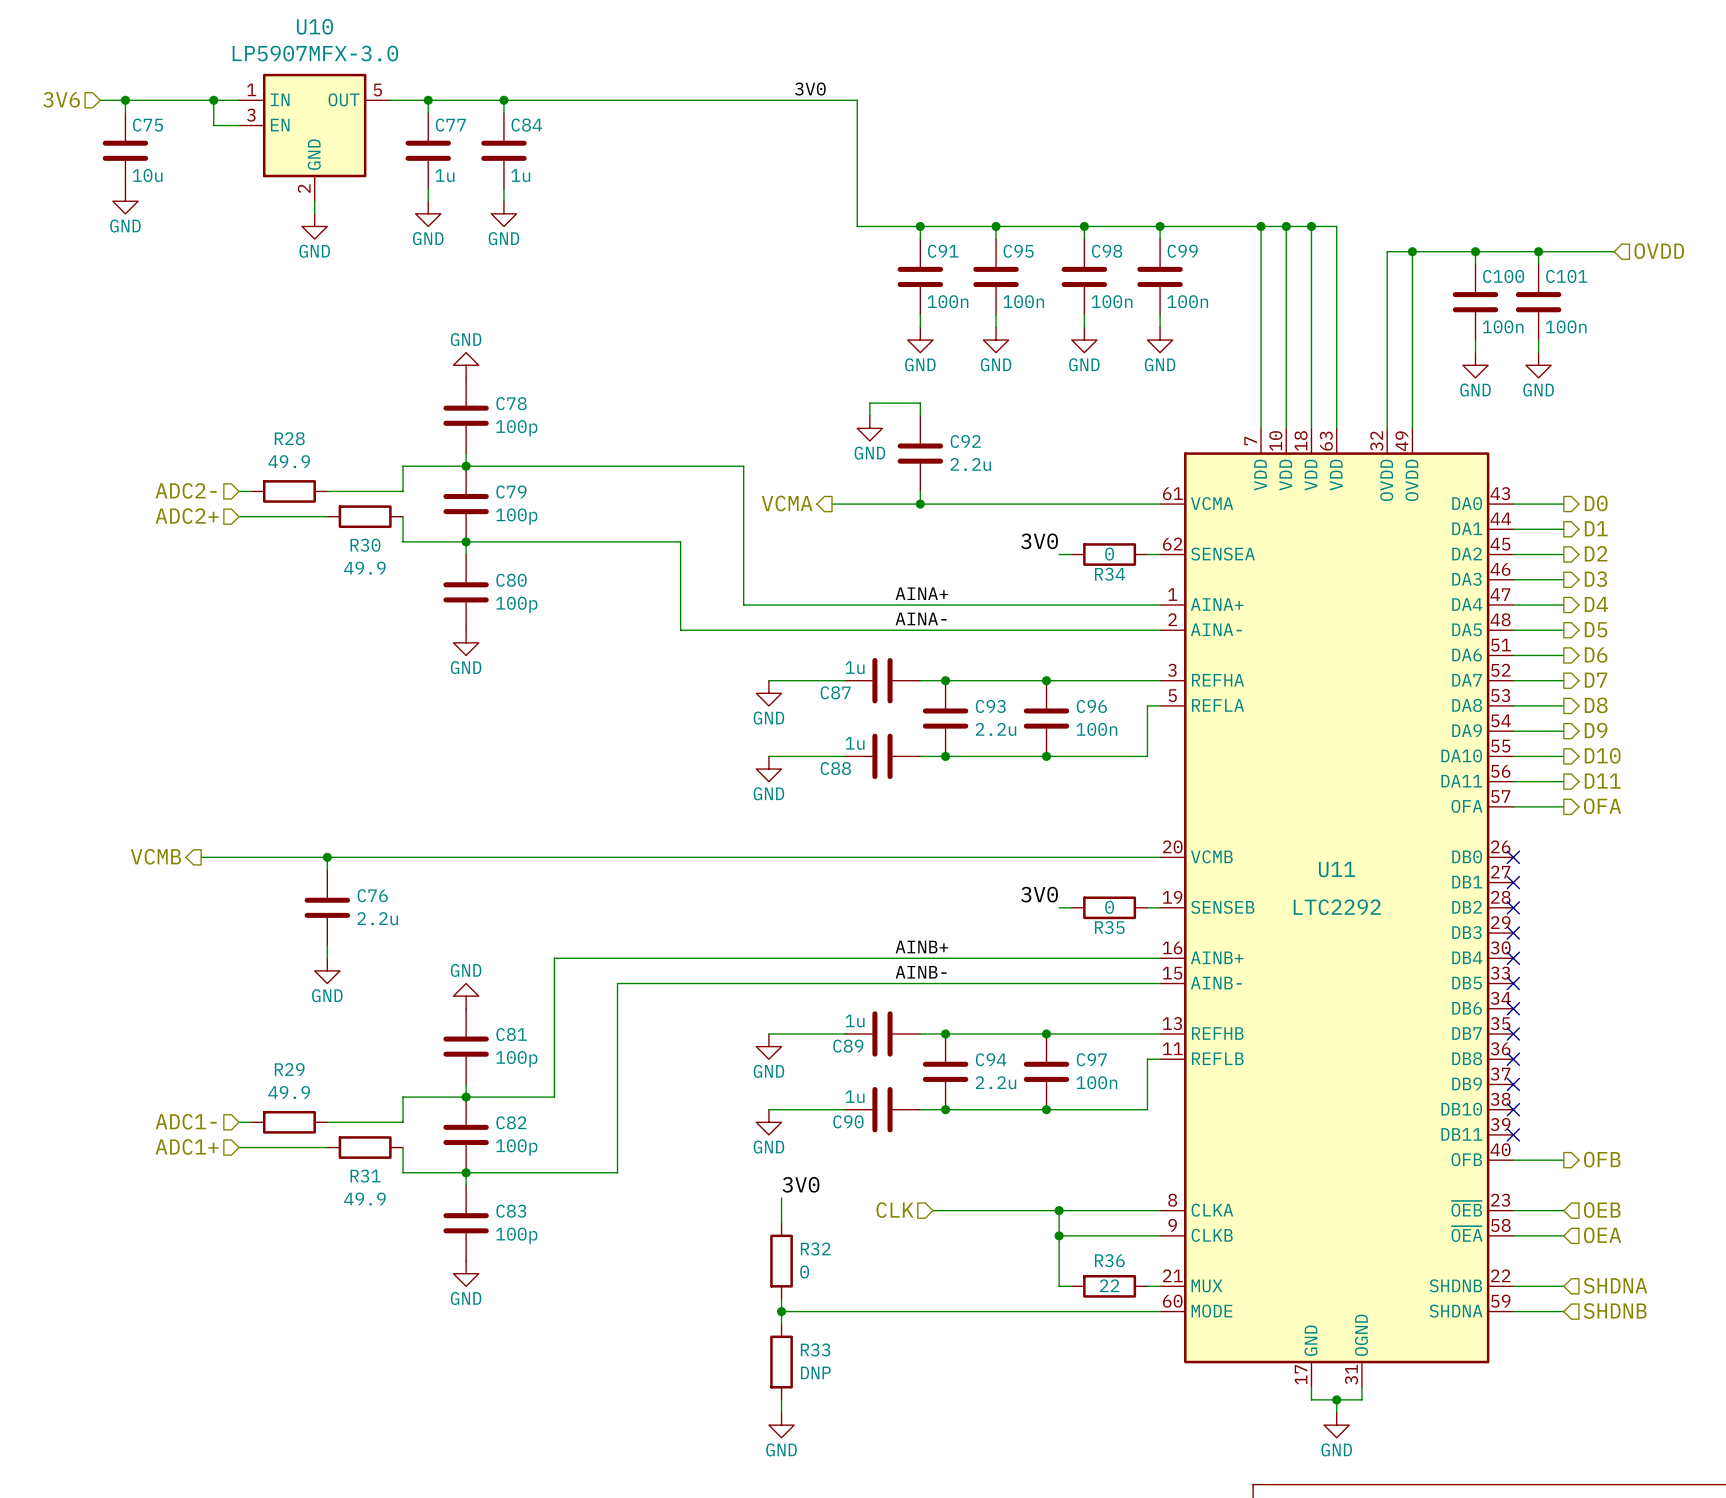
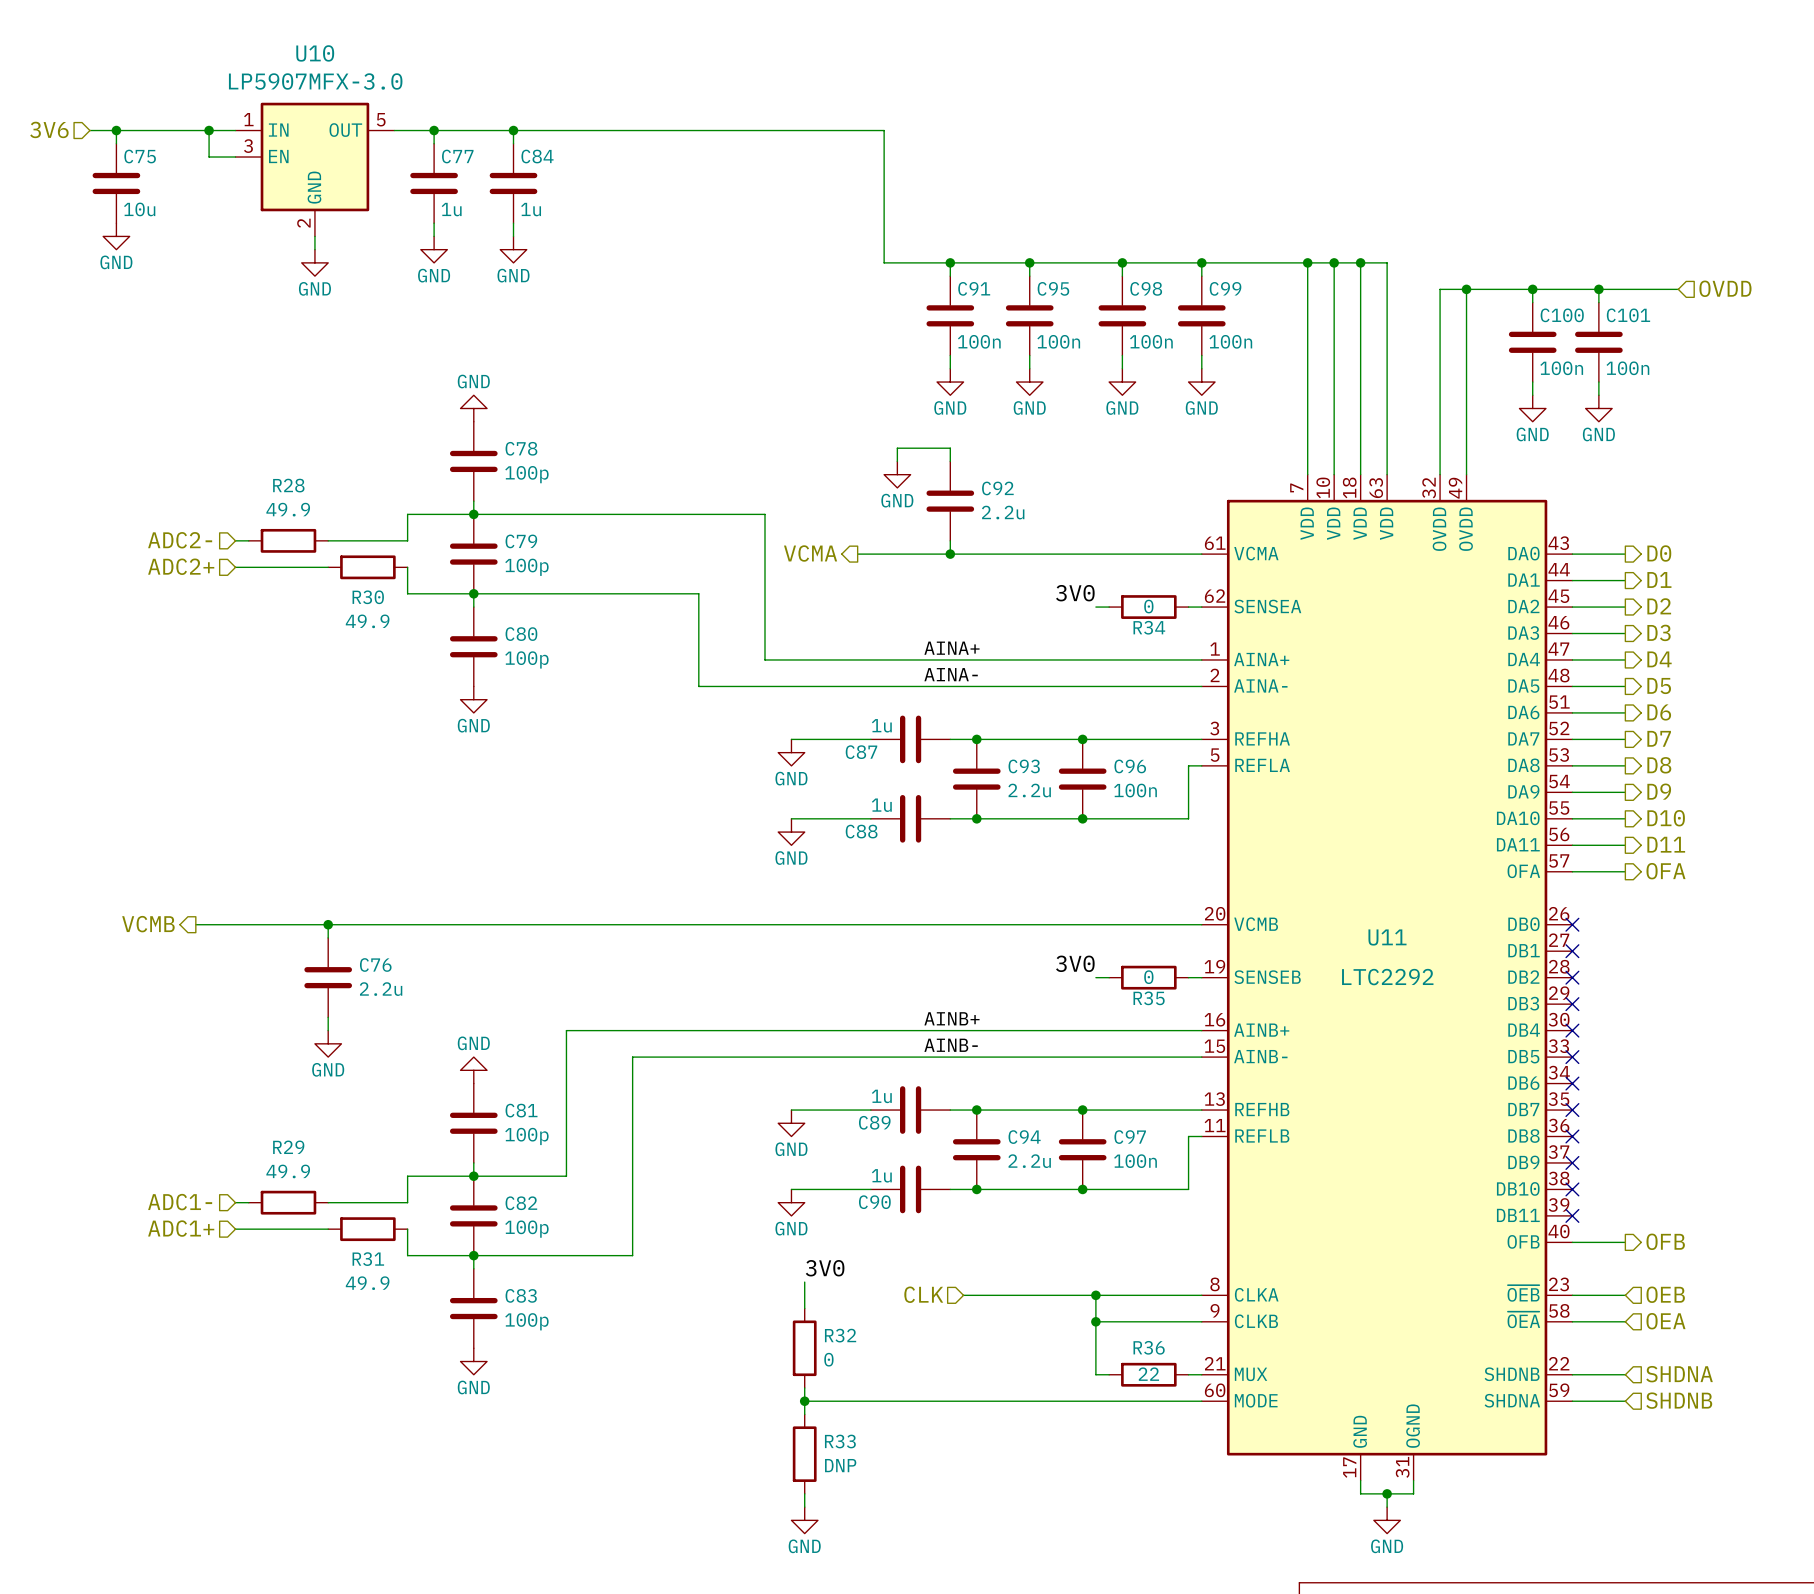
label: 3V0 (810, 89) -> none

